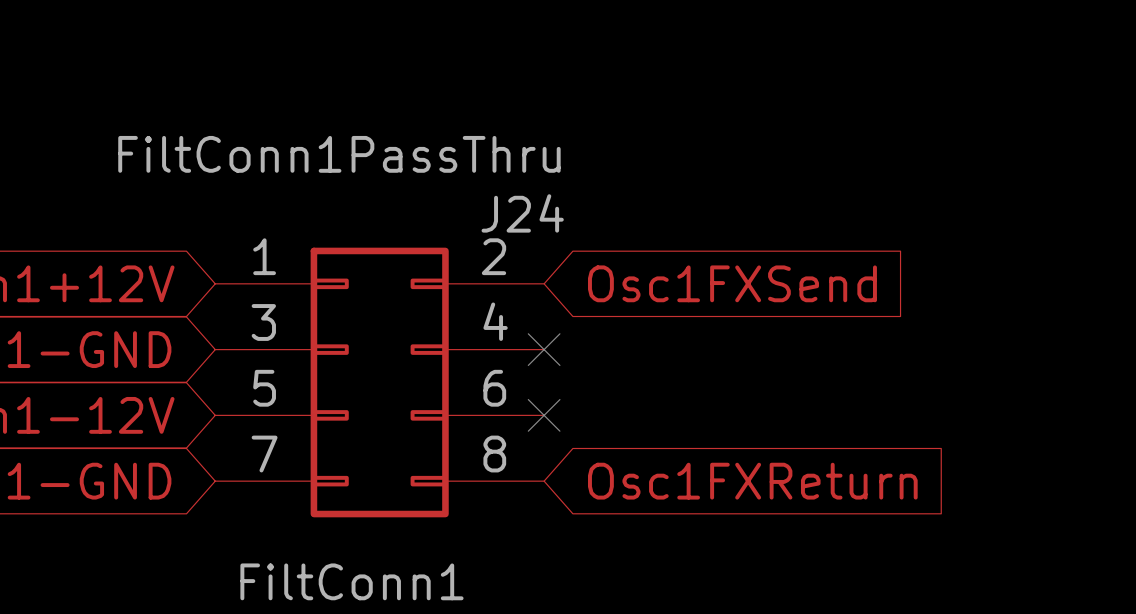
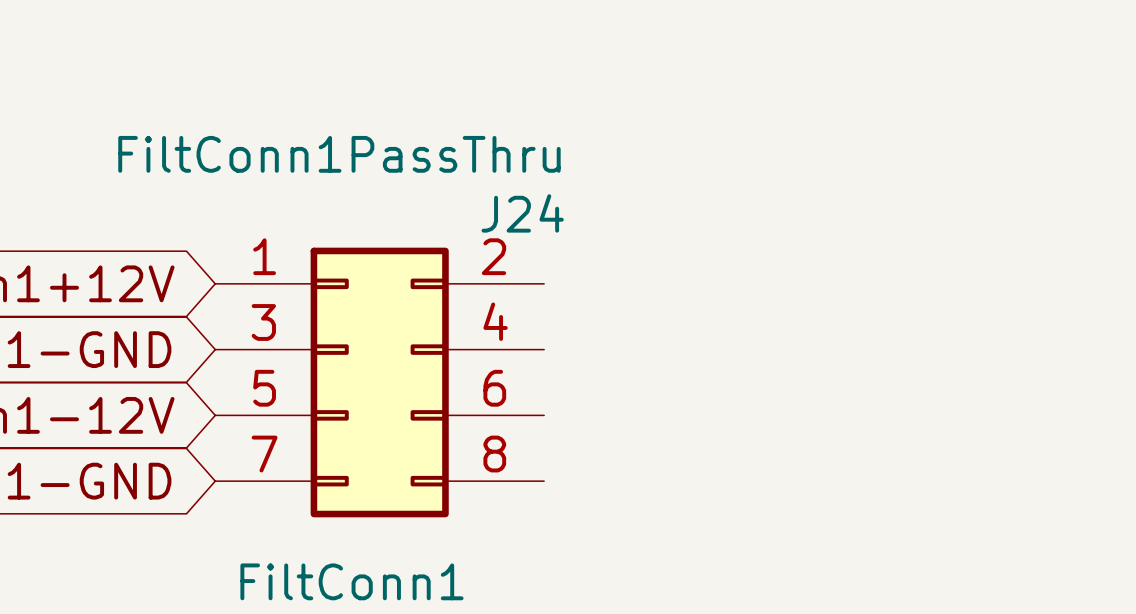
global label: Osc1FXSend (732, 283) -> none
no-connect mark: (544, 349) -> none
no-connect mark: (544, 415) -> none
global label: Osc1FXReturn (752, 481) -> none

